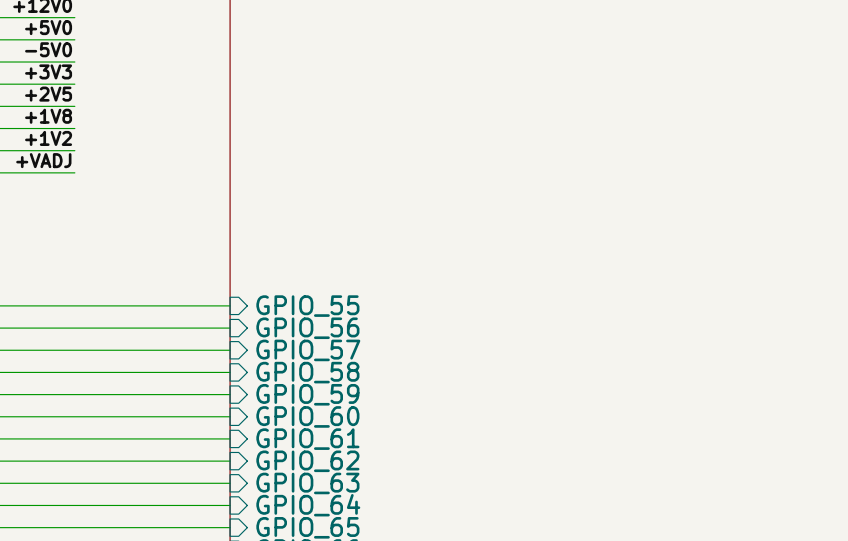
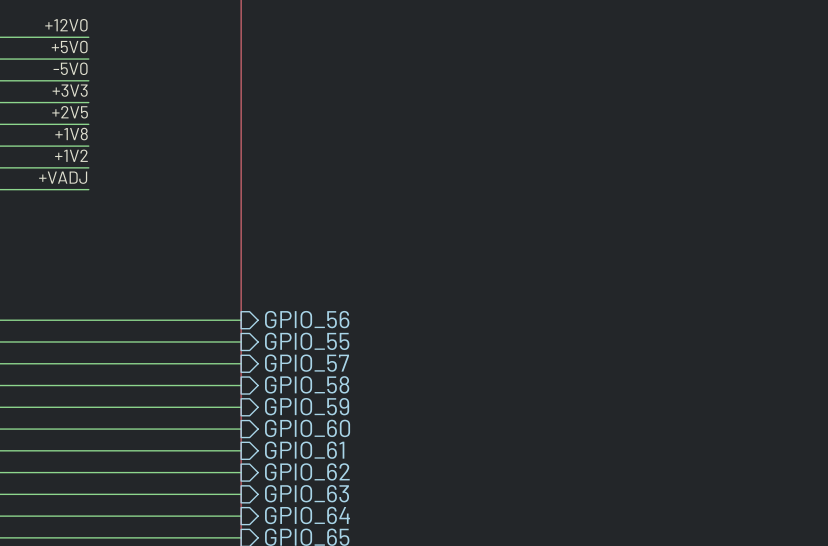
sheet pin: GPIO_55 (307, 306) -> GPIO_56 (307, 319)
sheet pin: GPIO_56 (307, 328) -> GPIO_55 (307, 341)

